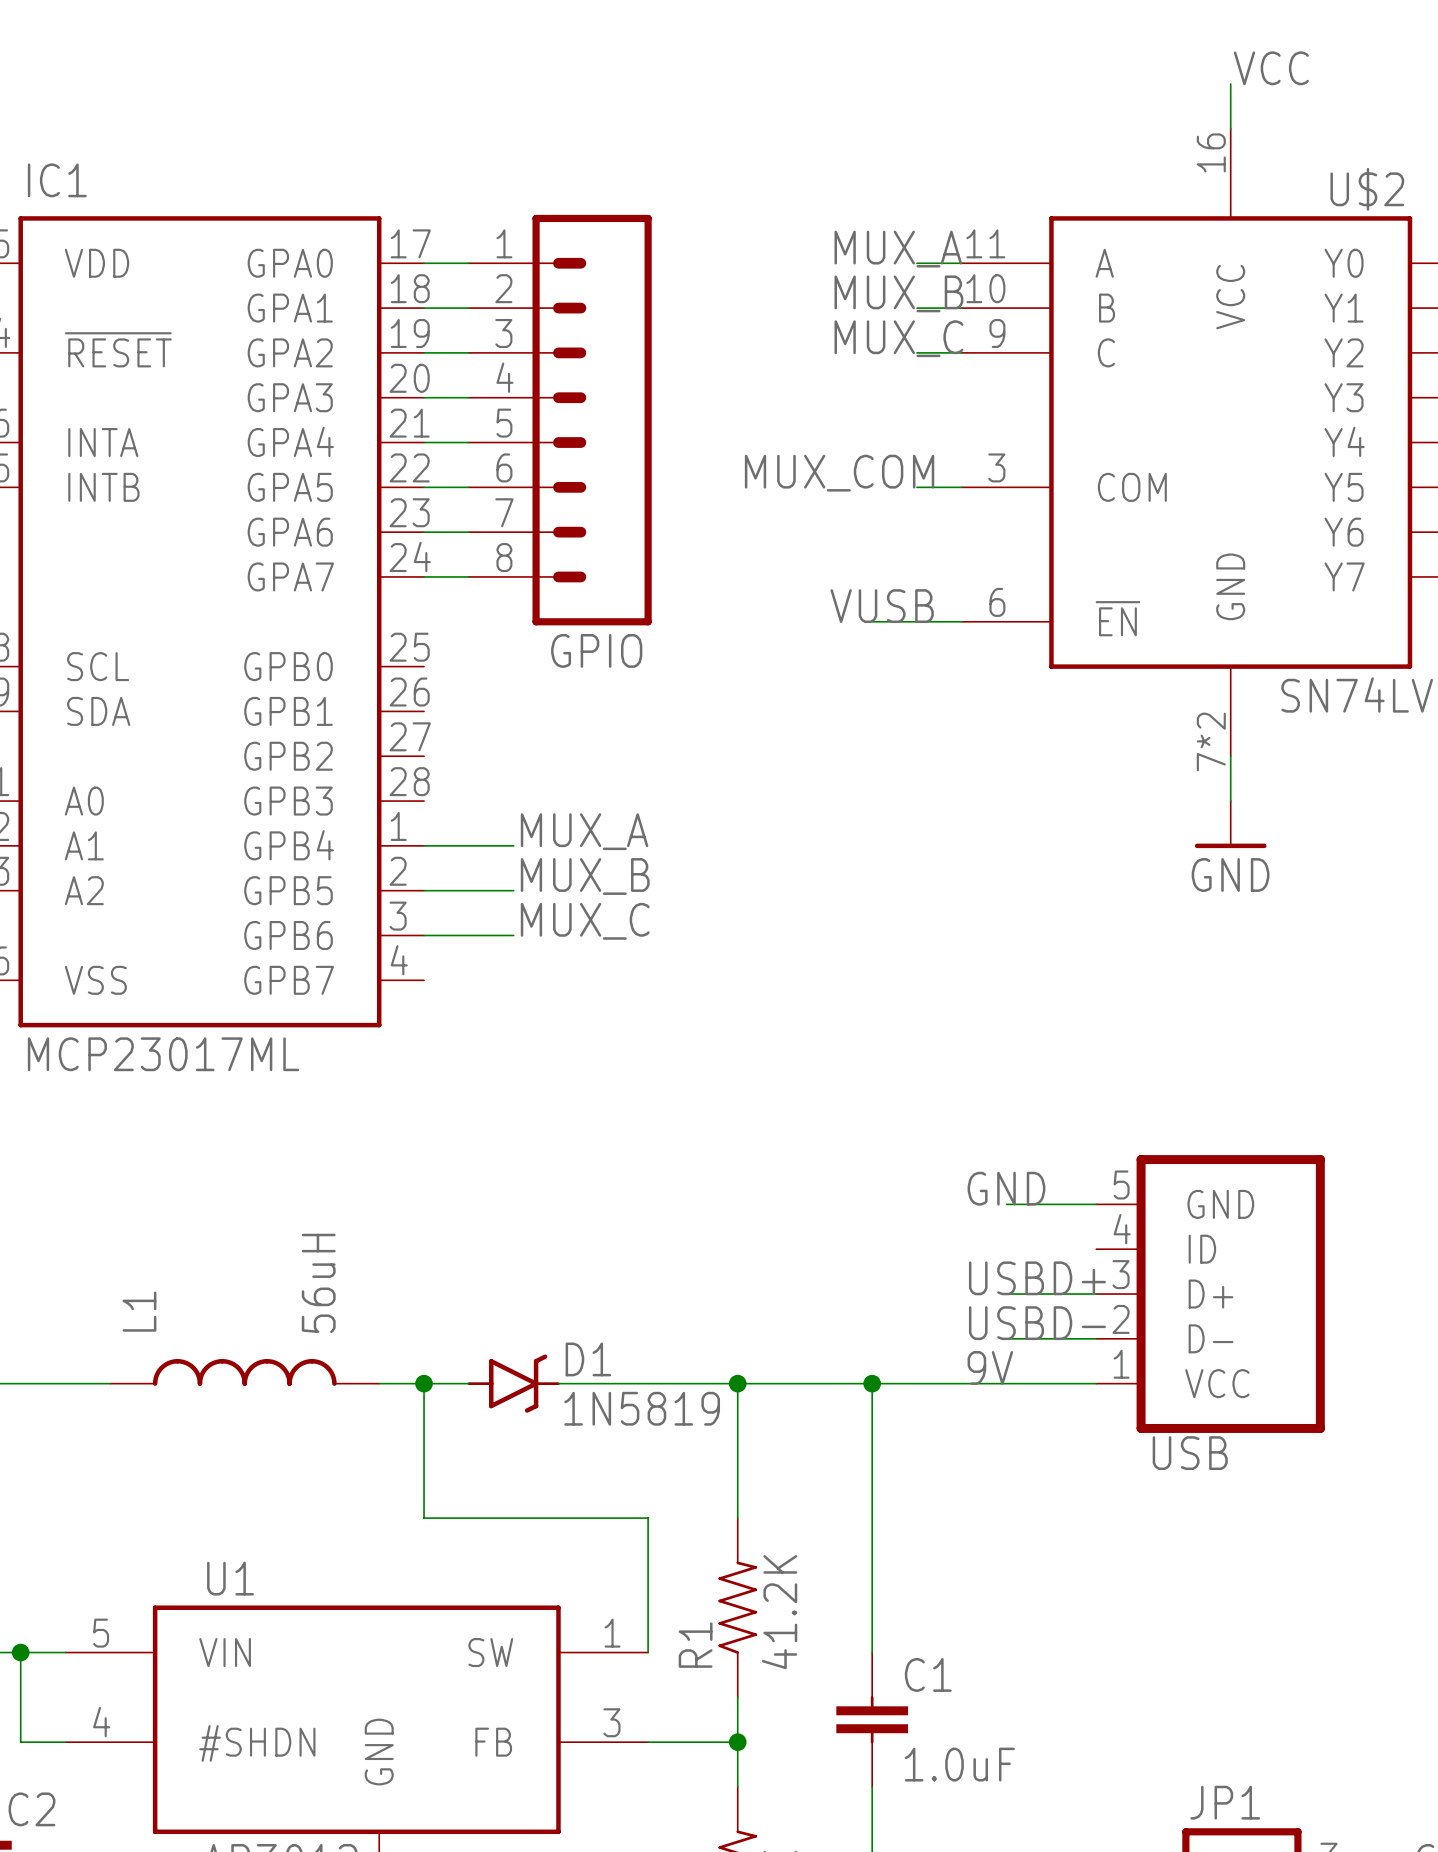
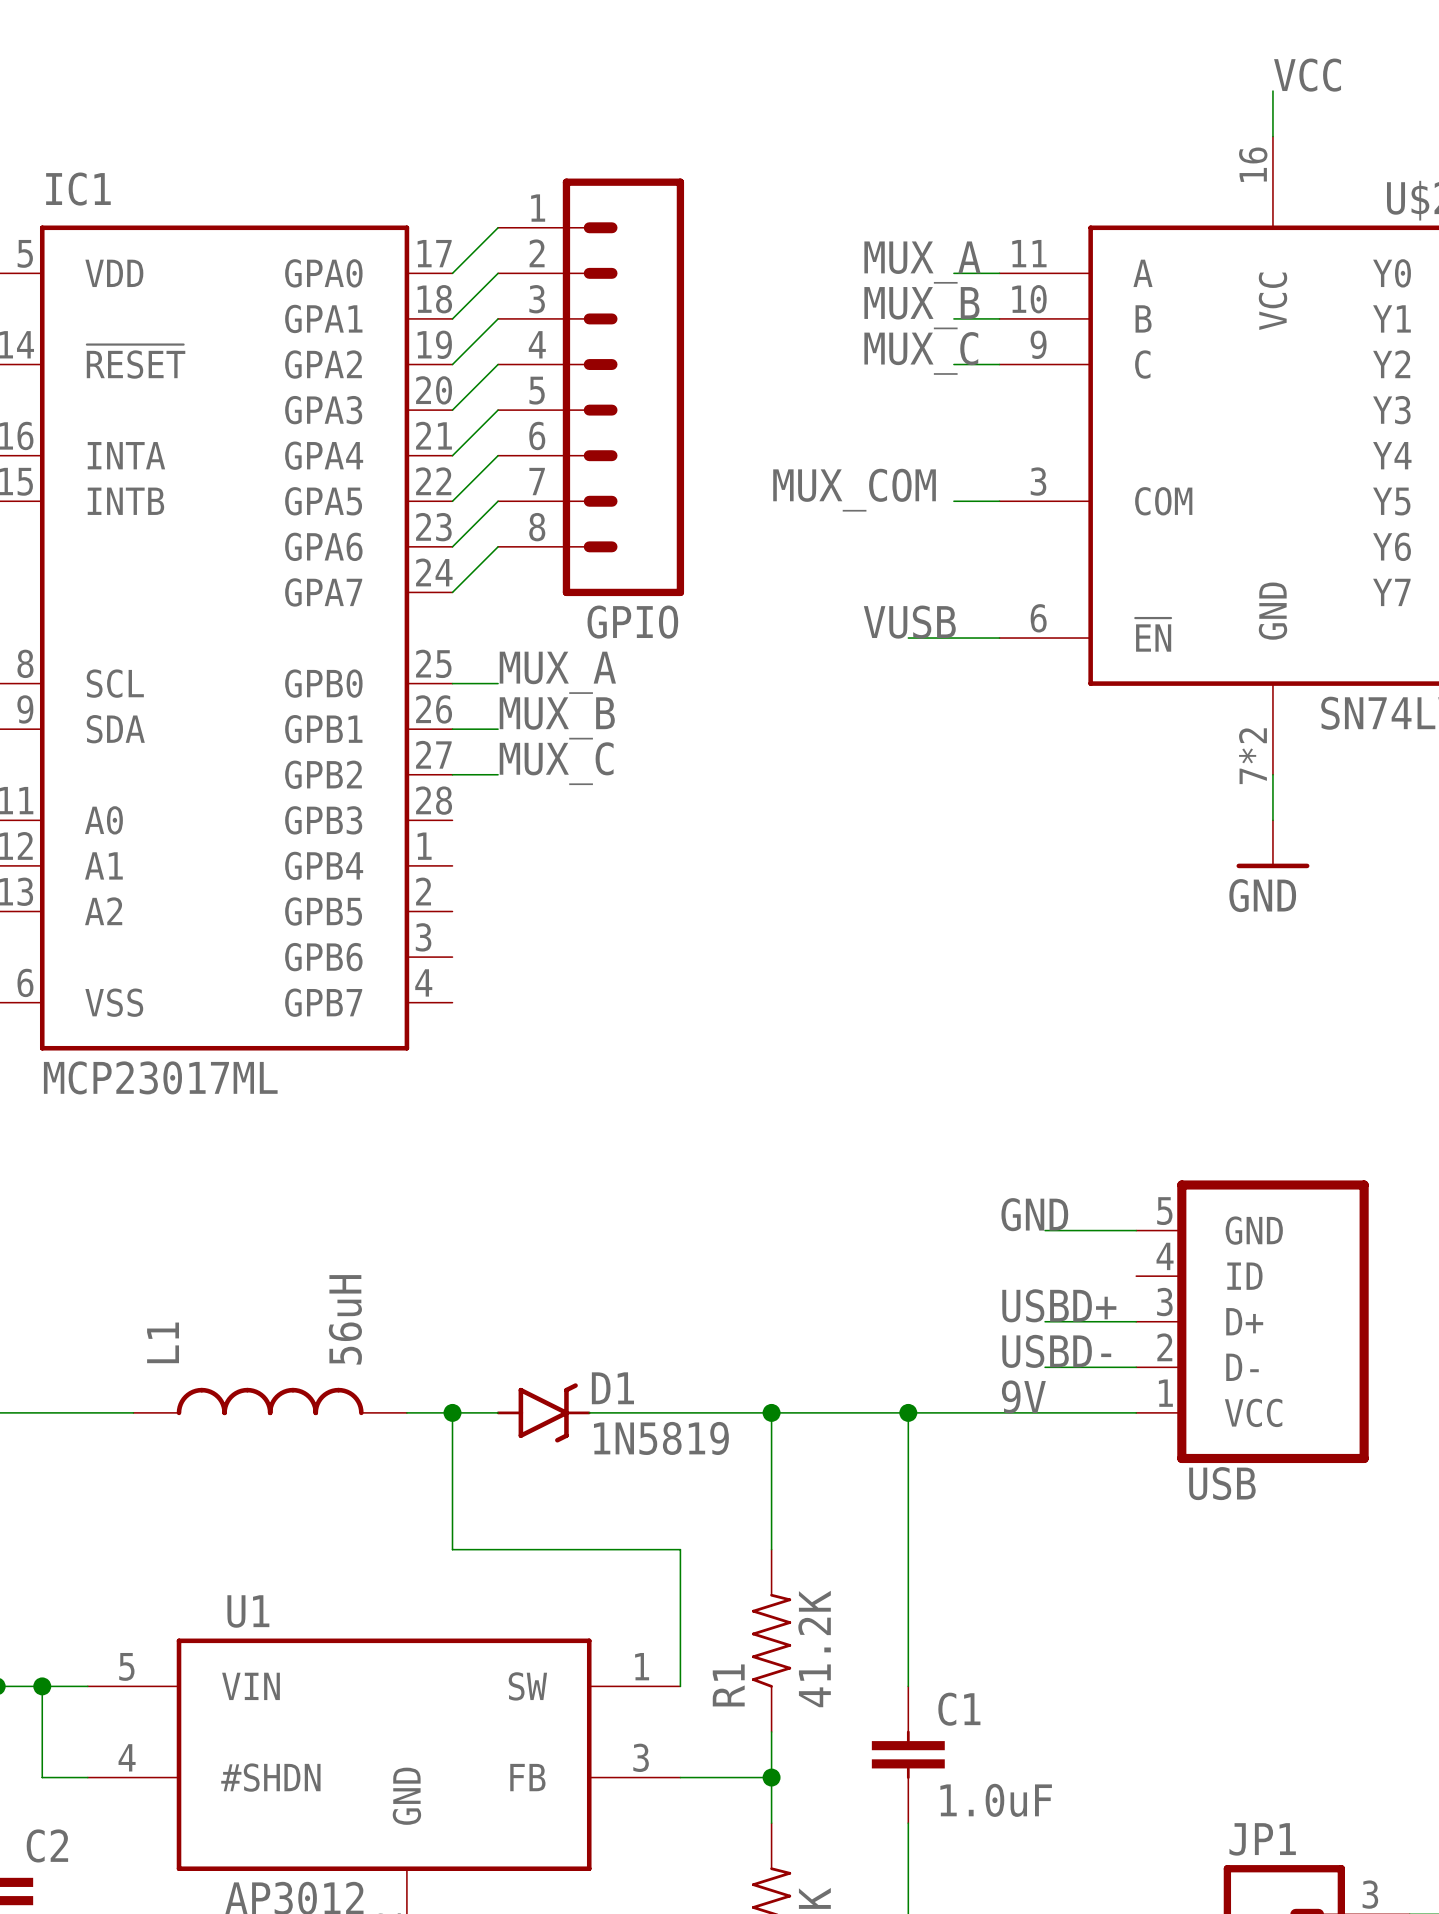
wire: none -> (498, 227) (452, 273)
wire: (424, 263) (468, 263) -> (452, 318) (498, 273)
wire: (424, 308) (468, 308) -> (452, 364) (498, 318)
wire: (424, 352) (468, 352) -> (452, 410) (498, 364)
wire: (424, 397) (468, 397) -> (452, 455) (498, 410)
GPIO position: (560, 420) -> (591, 387)
wire: (424, 442) (468, 442) -> (452, 501) (498, 455)
wire: (424, 487) (468, 487) -> (452, 546) (498, 501)
wire: (424, 532) (468, 532) -> (452, 592) (498, 546)
wire: (424, 576) (468, 576) -> (452, 774) (498, 774)
wire: none -> (452, 683) (498, 683)
wire: none -> (452, 729) (498, 729)
label position: MUX_A (584, 831) -> MUX_A (557, 672)
wire: (424, 845) (513, 845) -> none
label position: MUX_B (585, 876) -> MUX_B (557, 718)
wire: (424, 890) (513, 890) -> none
label position: MUX_C (585, 921) -> MUX_C (556, 763)
wire: (424, 935) (513, 935) -> none

